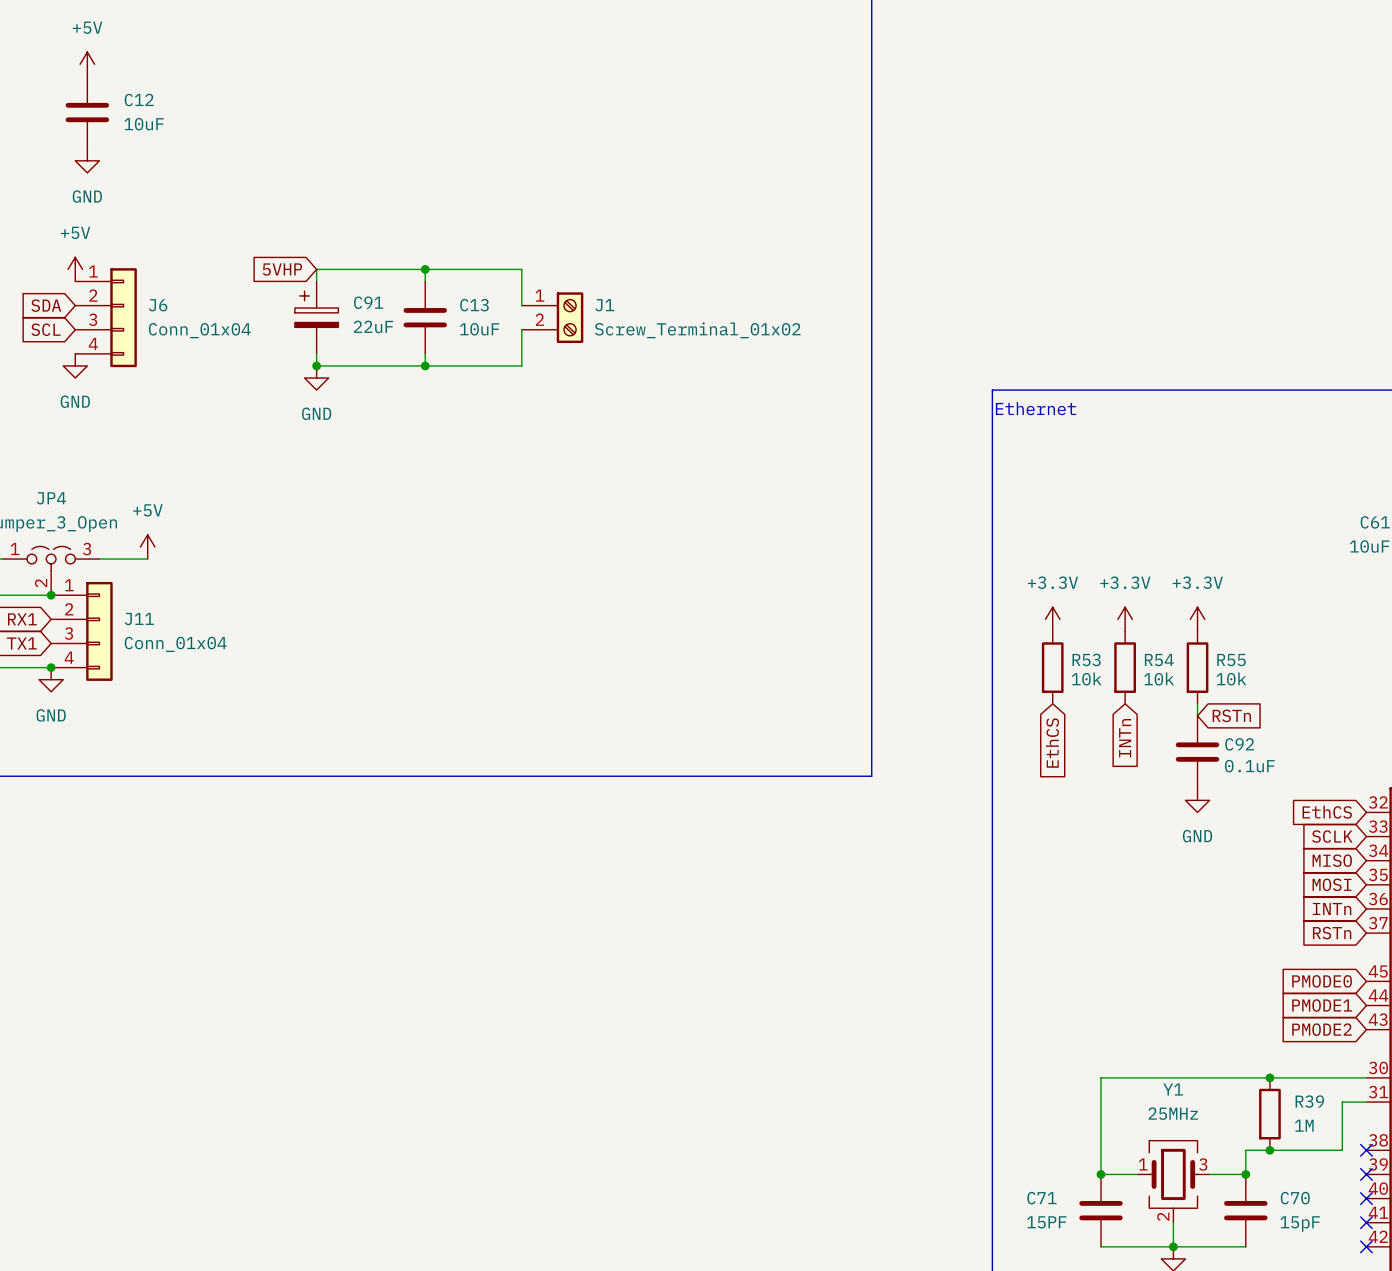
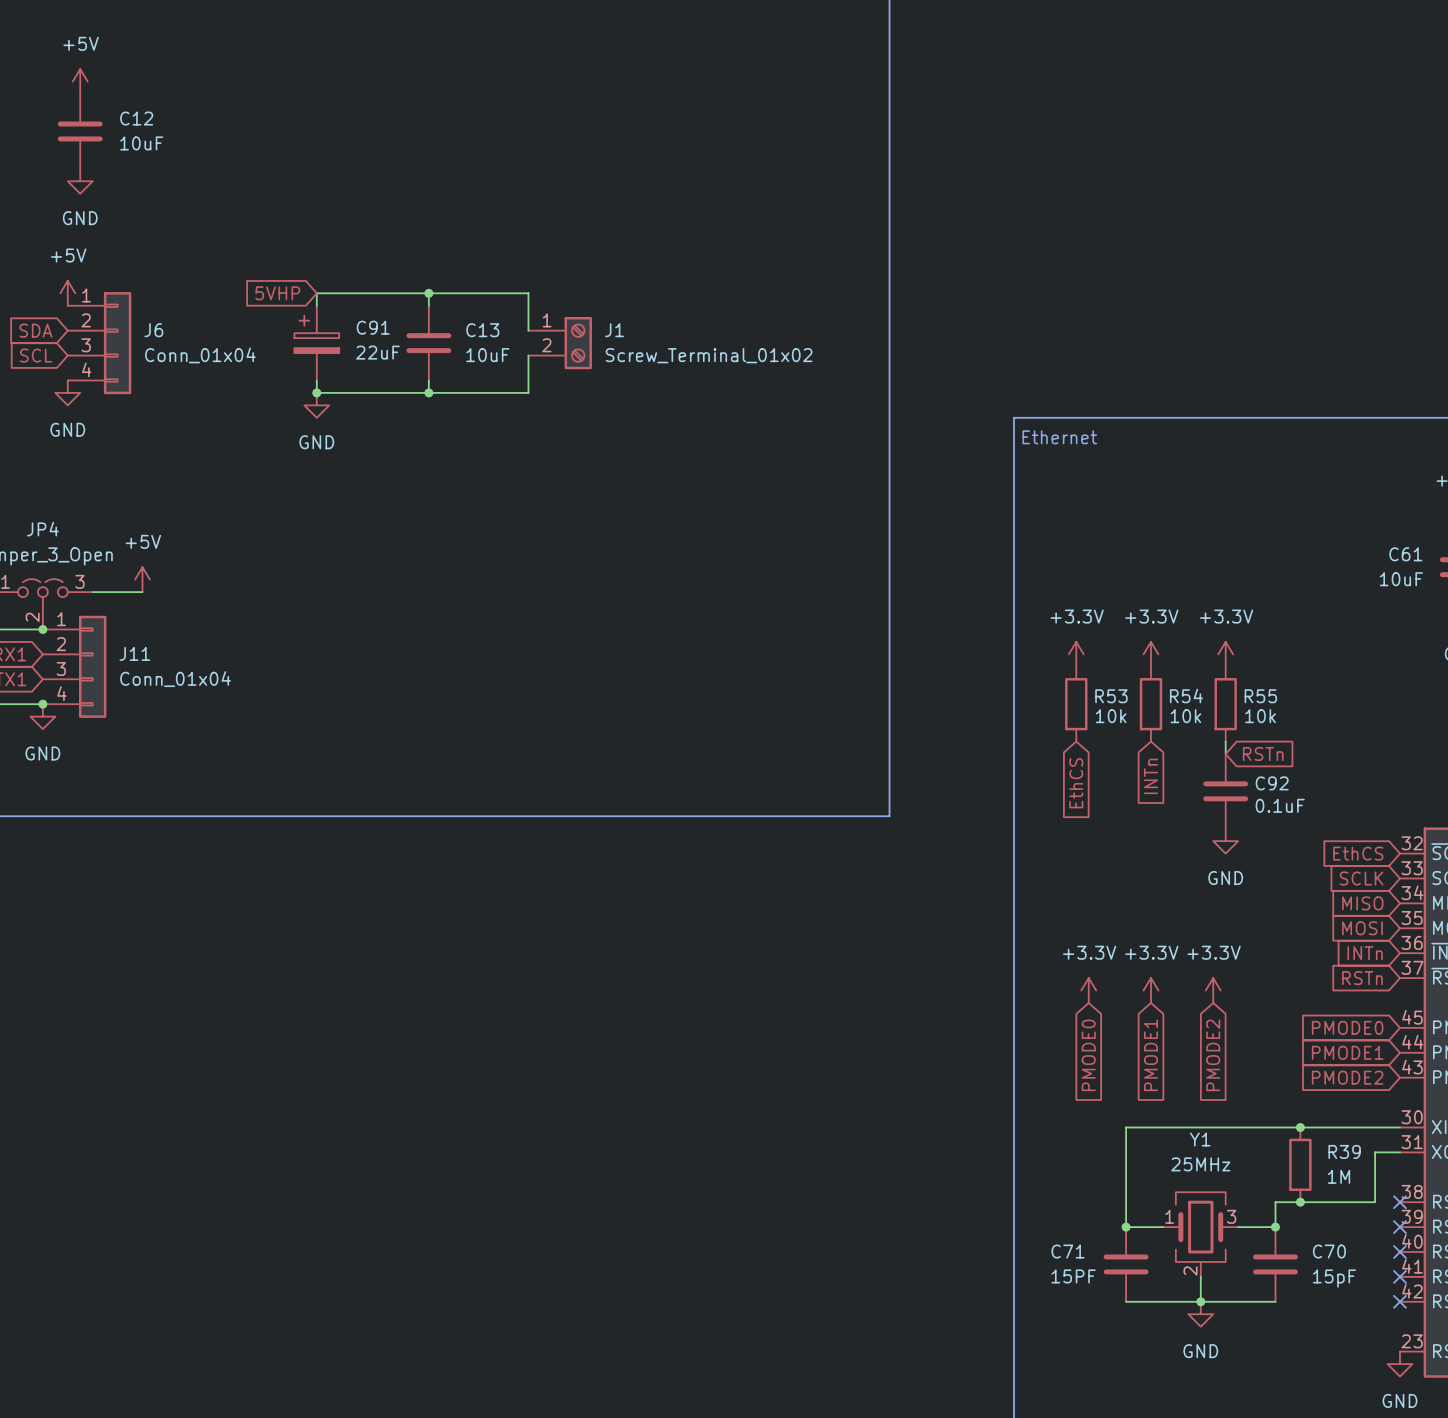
power symbol: none -> +3.3V (1088, 990)
power symbol: none -> +3.3V (1150, 990)
power symbol: none -> +3.3V (1213, 990)
global label: none -> PMODE0 (1088, 1055)
global label: none -> PMODE1 (1150, 1055)
global label: none -> PMODE2 (1213, 1055)

